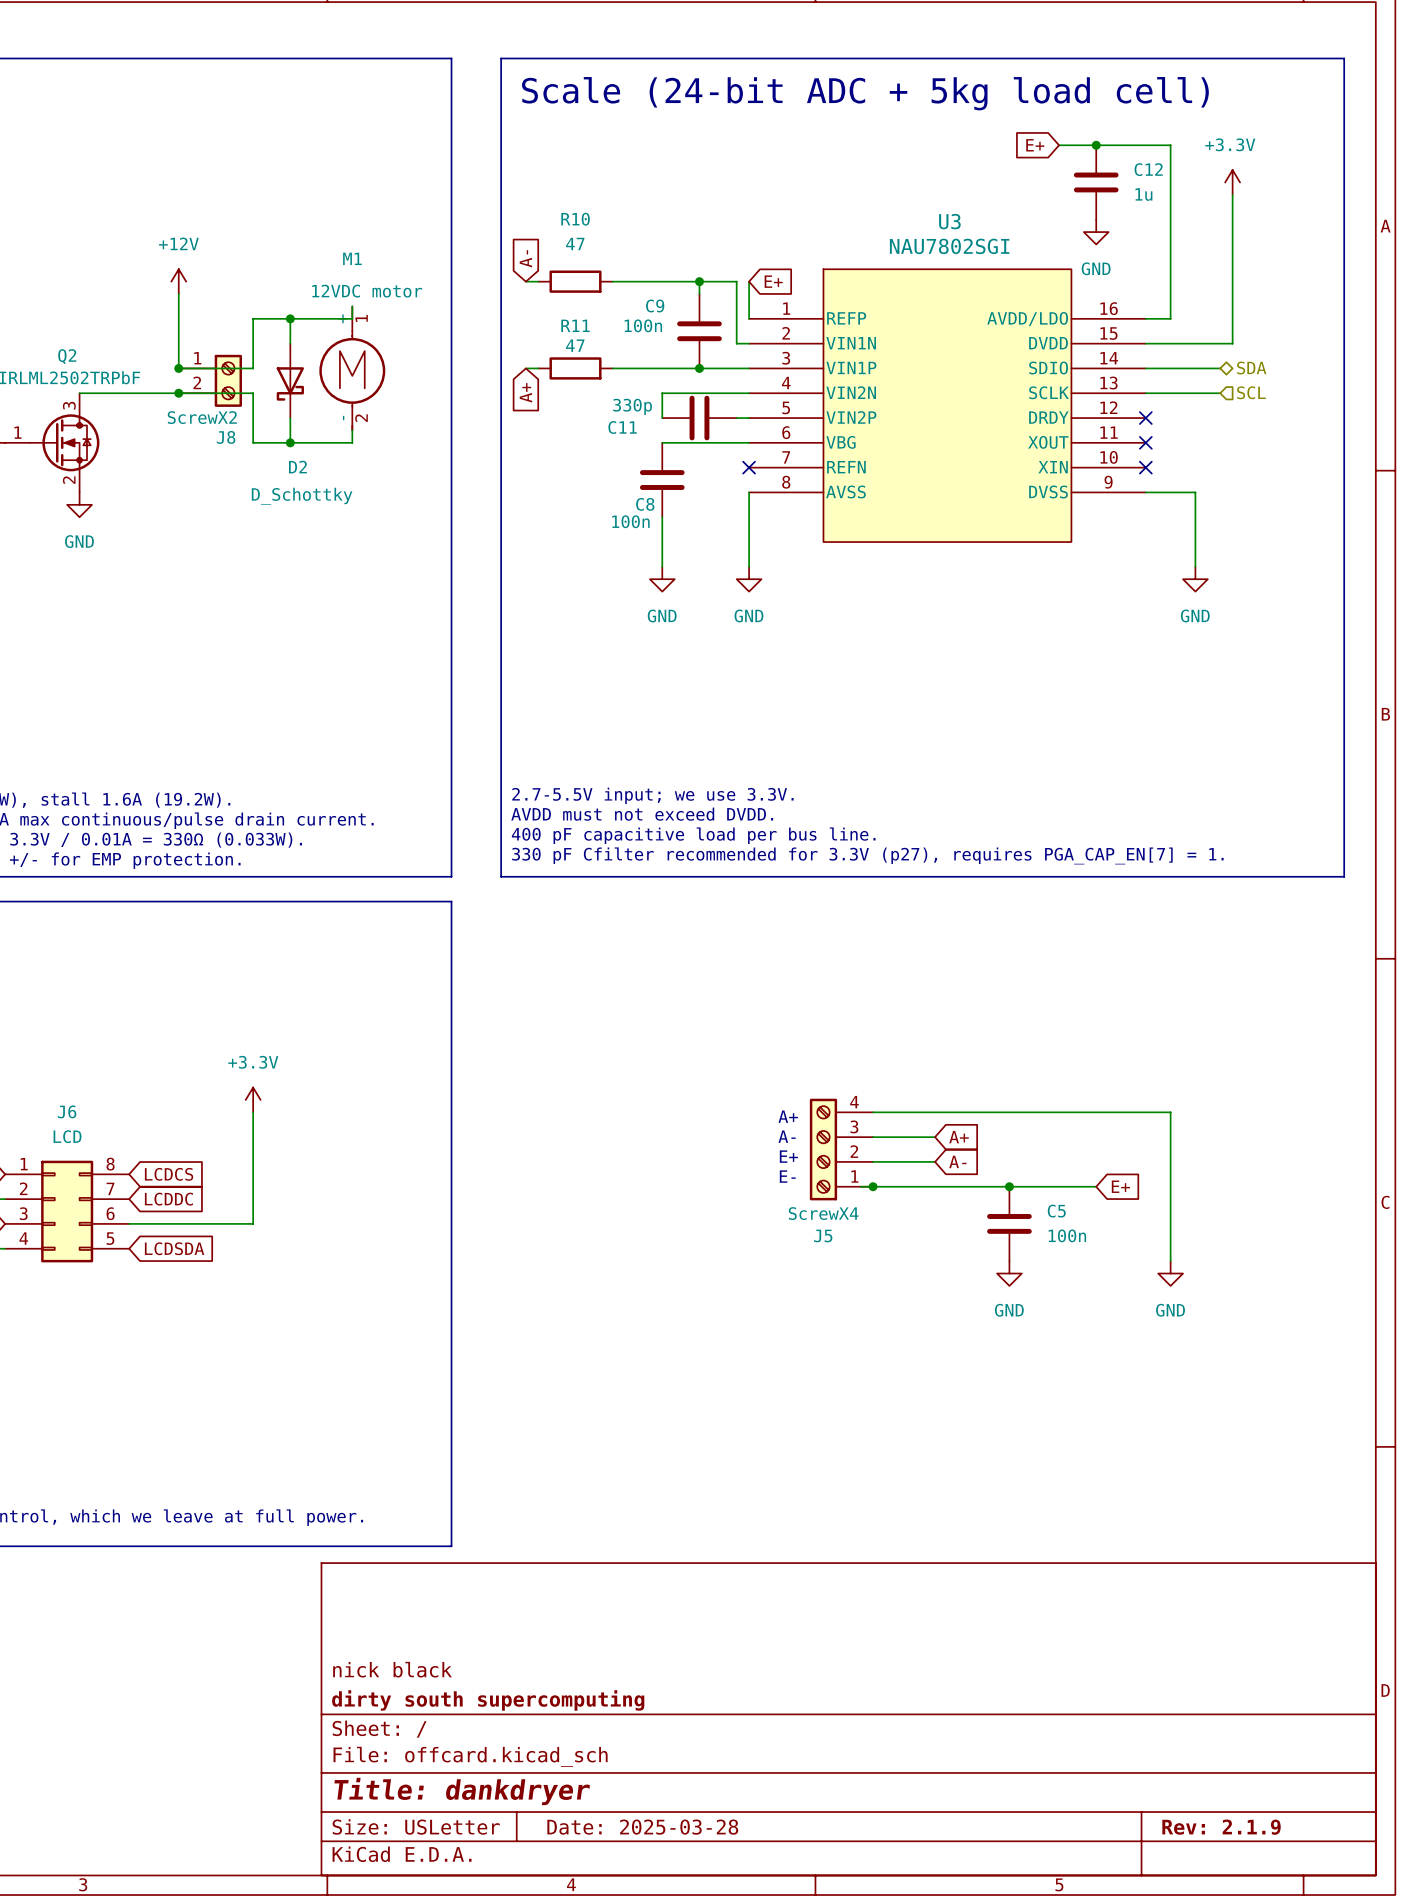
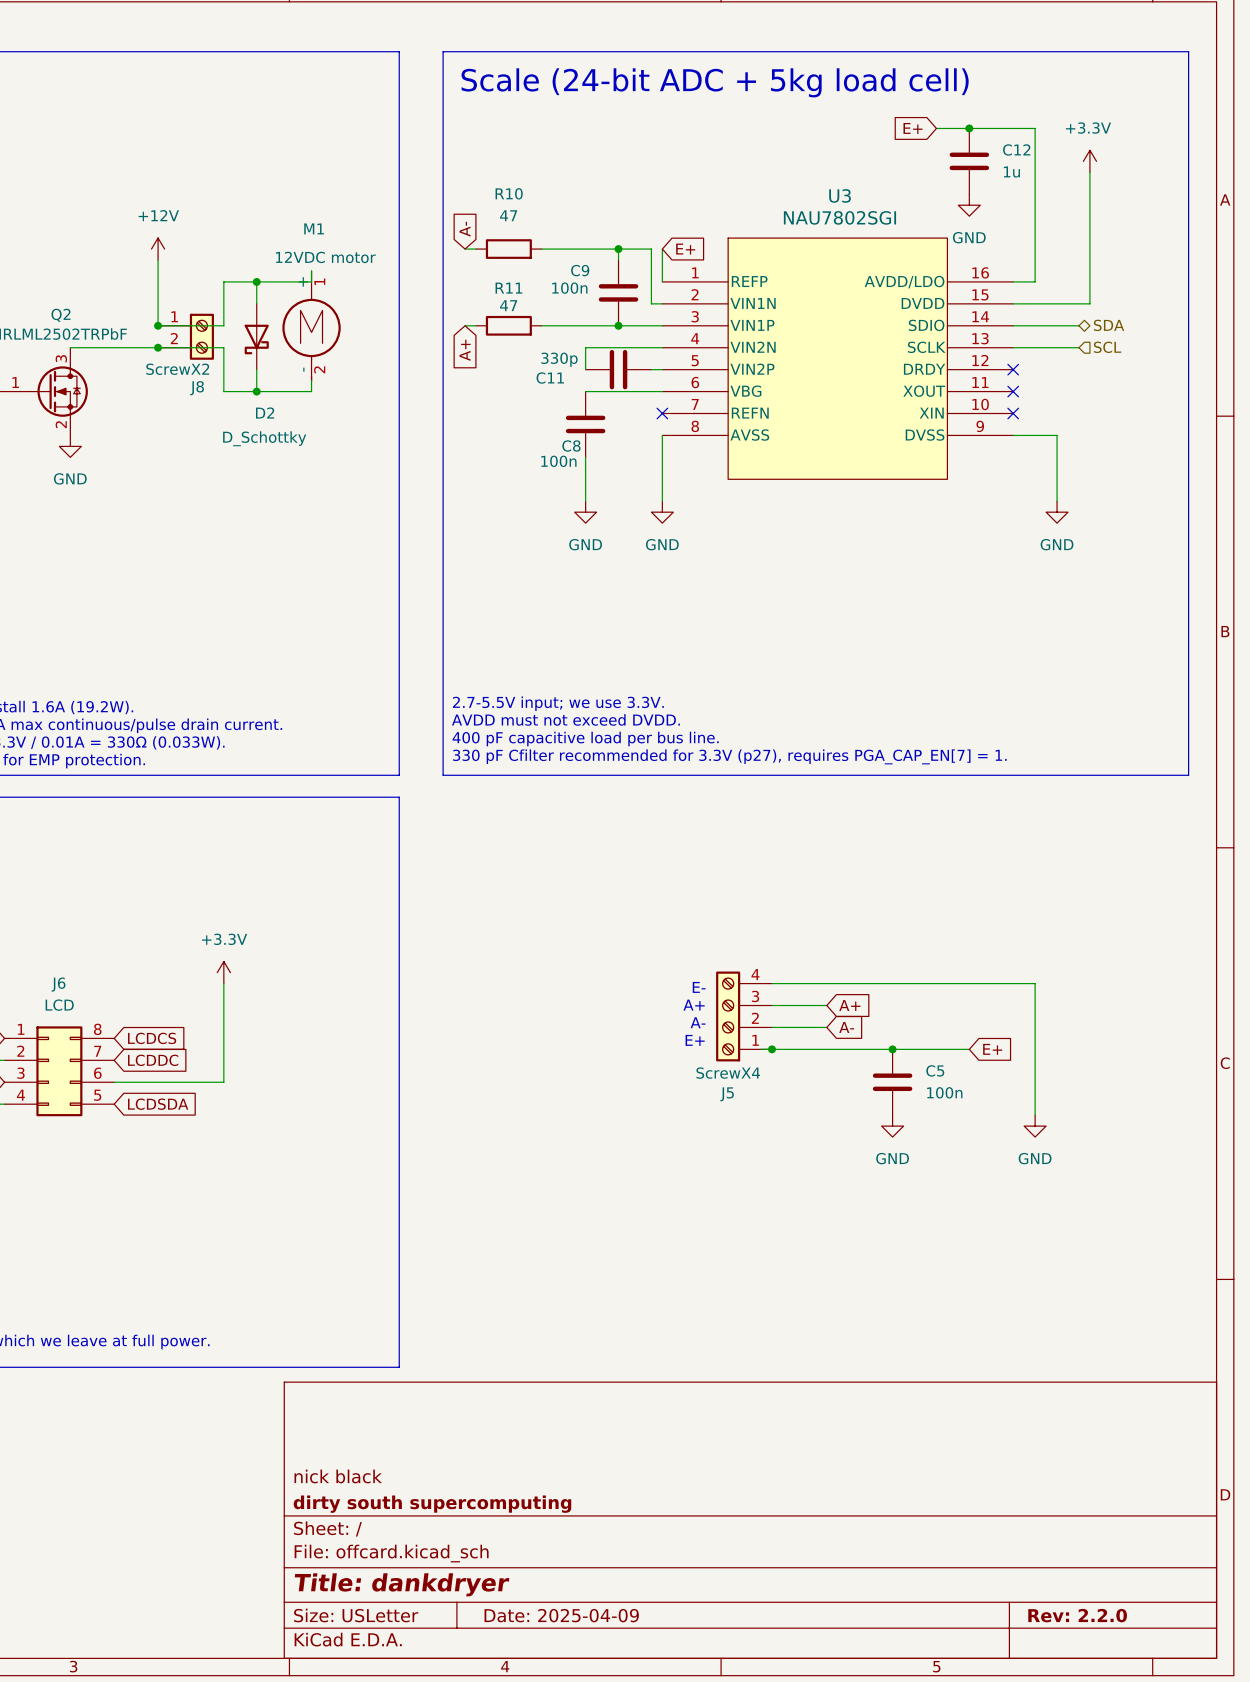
text: A+ (788, 1116) -> E- (699, 987)
text: A- (787, 1136) -> A+ (694, 1005)
text: E+ (788, 1156) -> A- (698, 1022)
text: E- (787, 1176) -> E+ (695, 1040)
title block: Date: 2025-03-28 (642, 1827) -> Date: 2025-04-09 (561, 1615)
title block: Rev: 2.1.9 (1221, 1827) -> Rev: 2.2.0 (1077, 1615)

